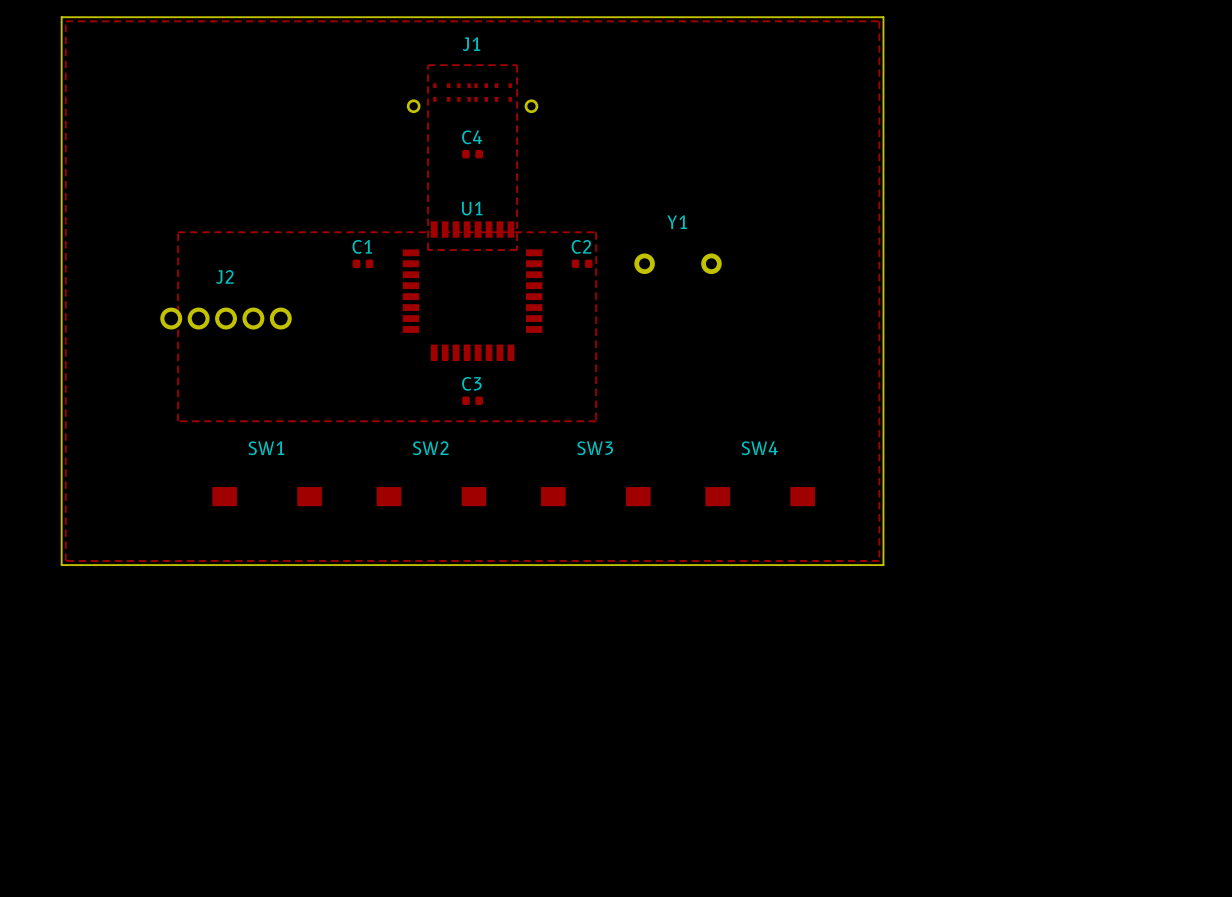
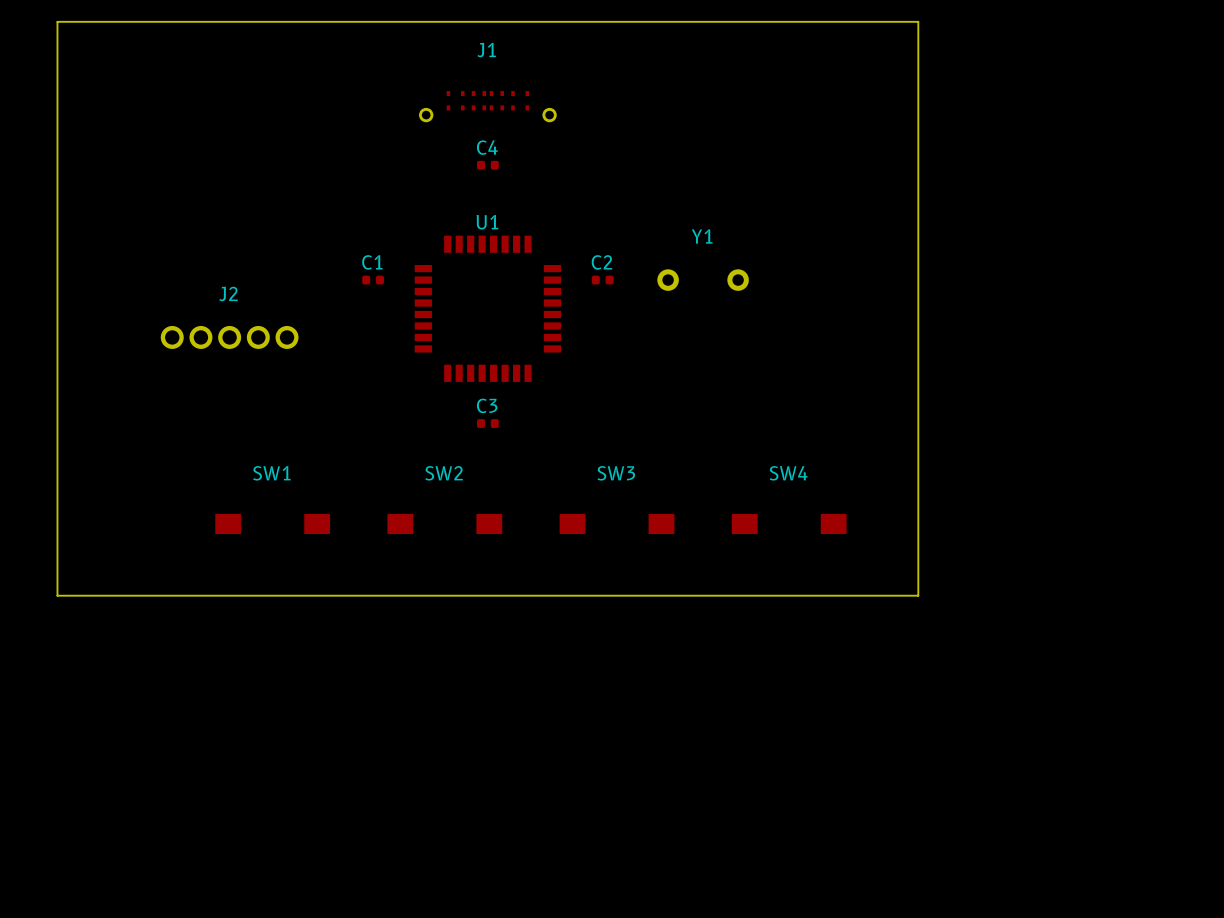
zone outline: (65, 21) (879, 21) (879, 560) (65, 560) (65, 21) -> none
zone outline: (428, 65) (517, 65) (517, 250) (428, 250) (428, 65) -> none
zone outline: (178, 232) (596, 232) (596, 421) (178, 421) (178, 232) -> none

